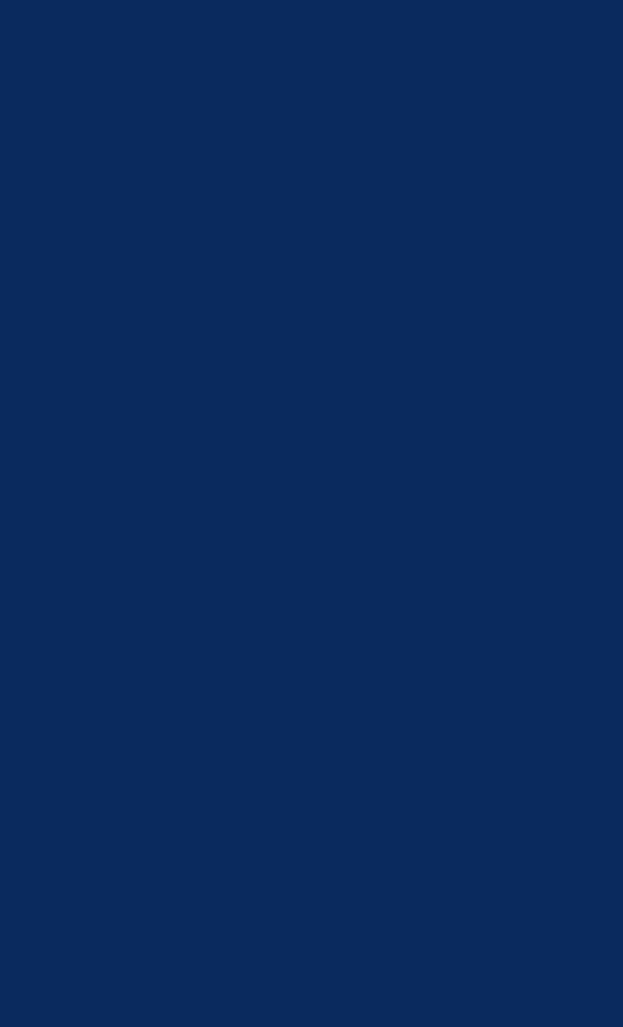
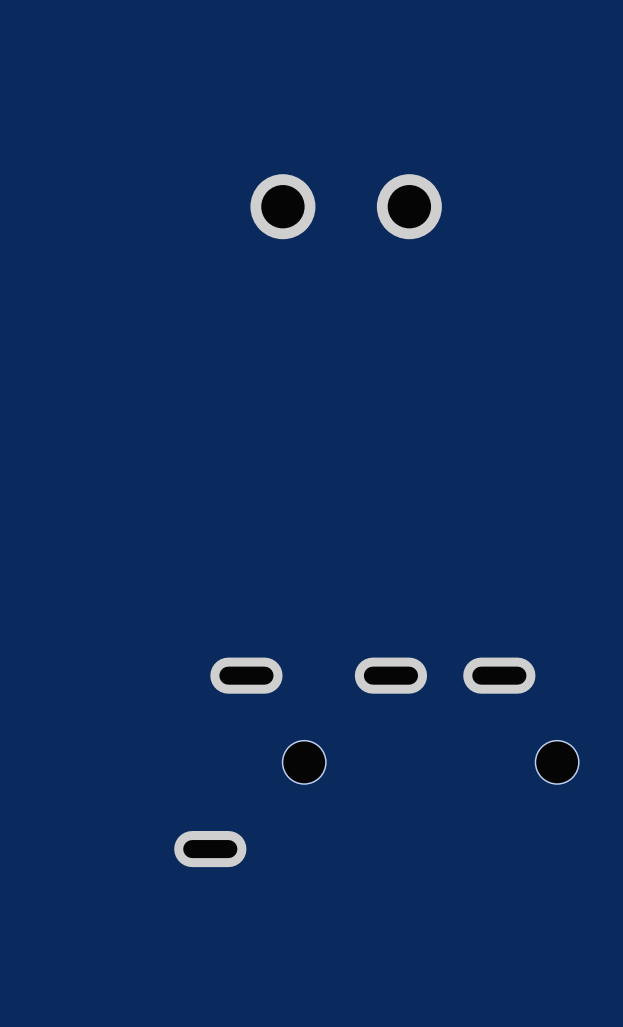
part: none -> (346, 206)
part: none -> (376, 762)

